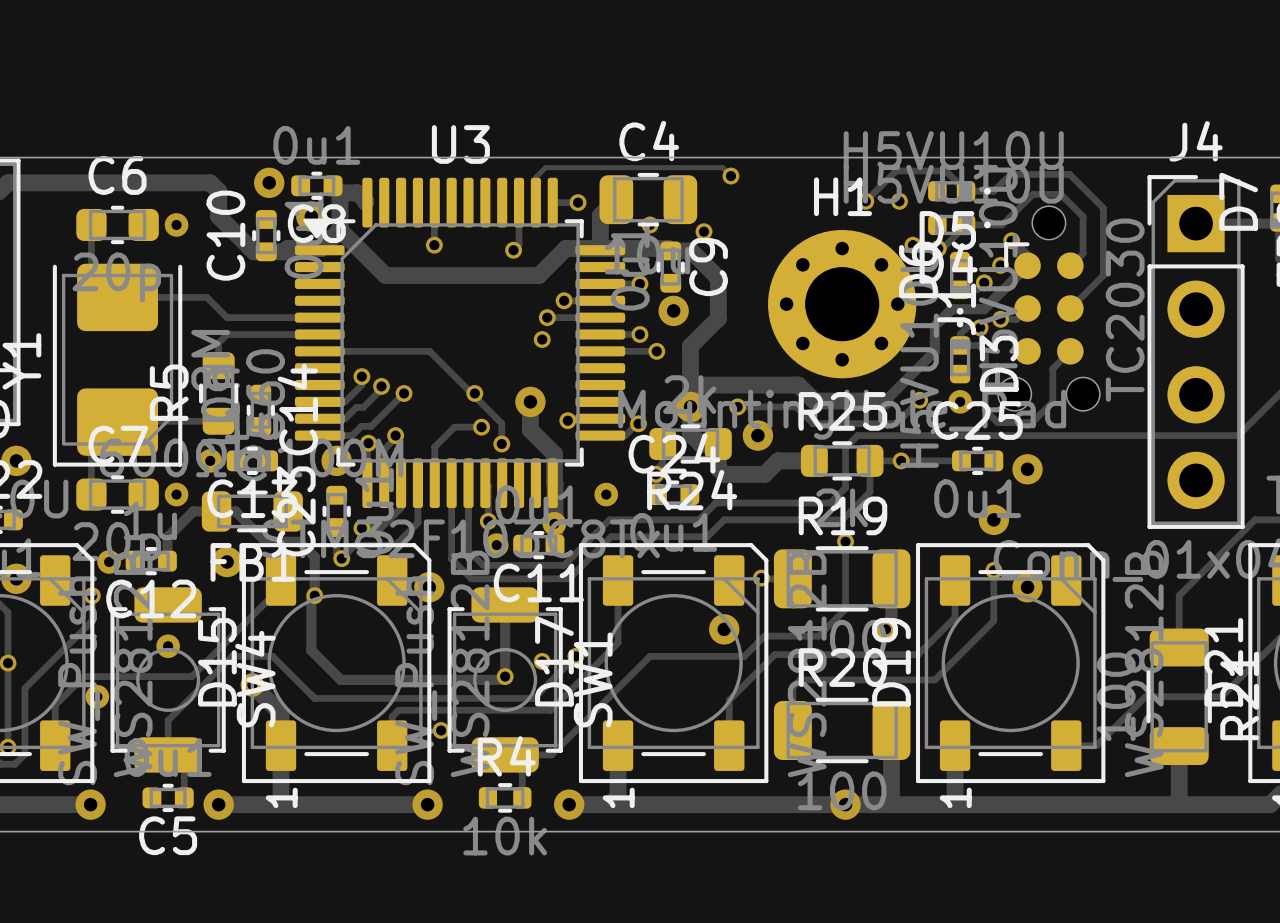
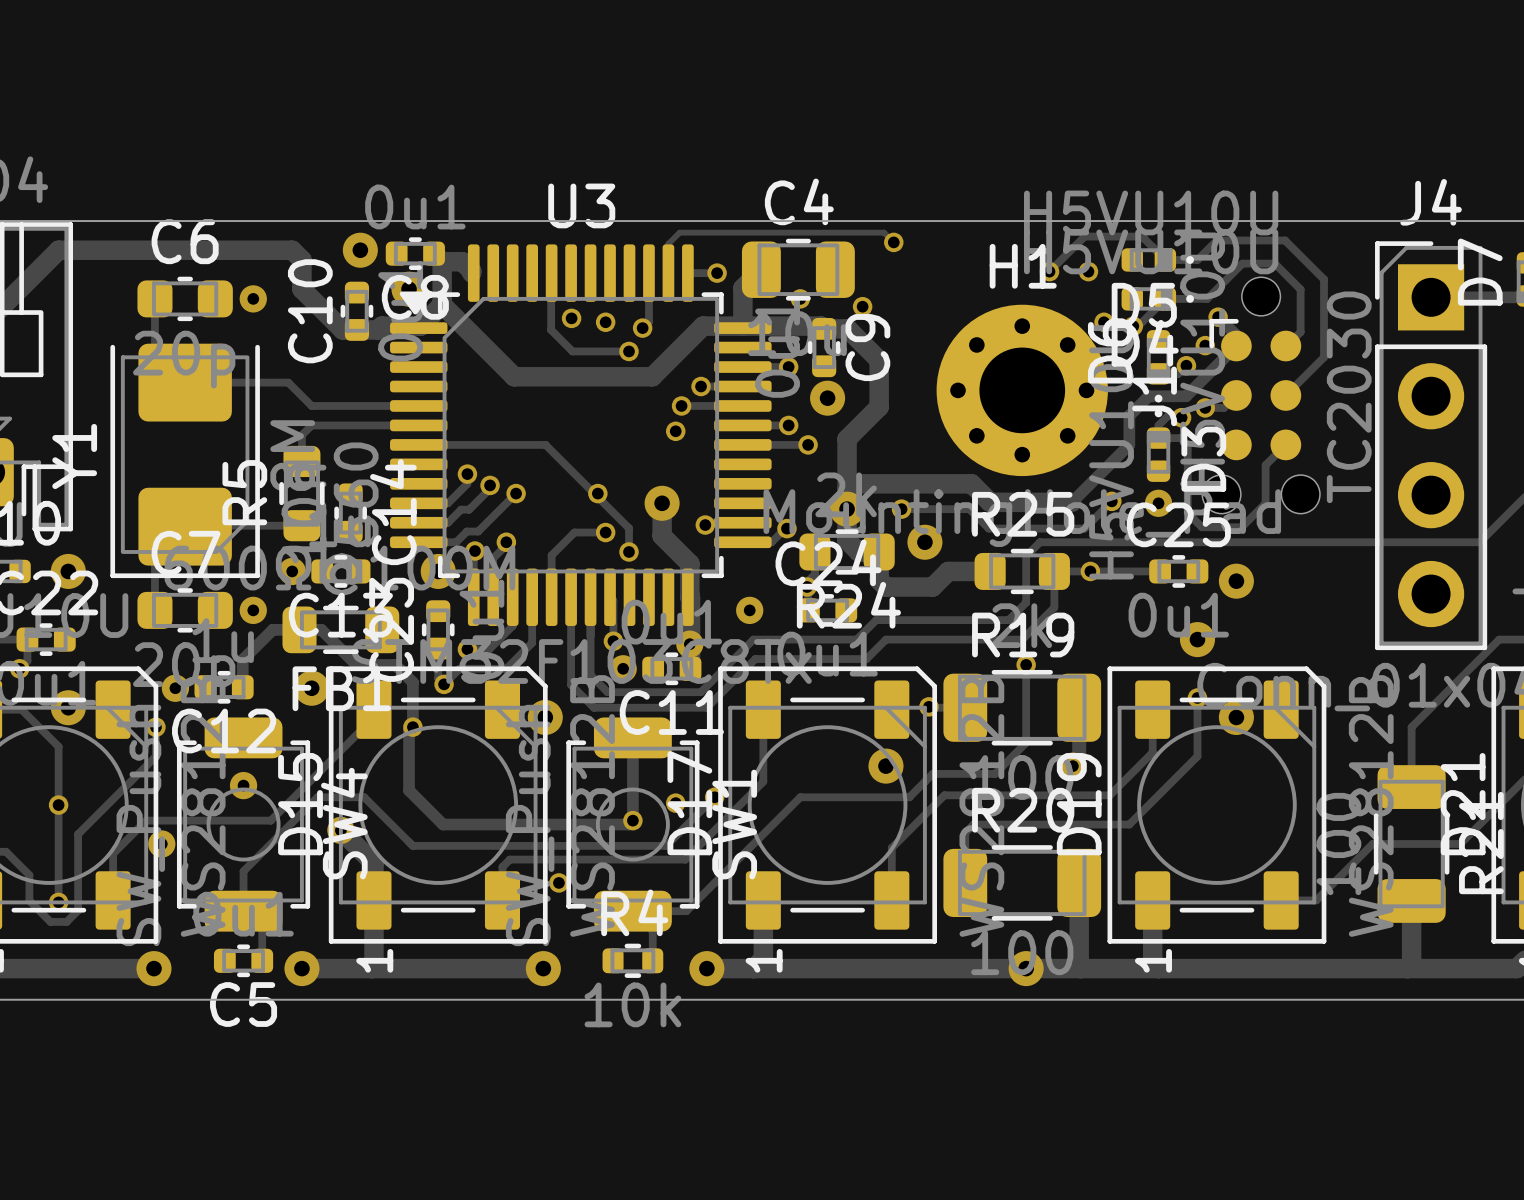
track: none -> (551, 322) (551, 330) (572, 351) (629, 351)
via position: (434, 245) -> (571, 318)
via: none -> (605, 322)
via: none -> (629, 351)
track: (385, 275) (538, 275) -> (494, 357) (514, 376) (652, 376) (671, 357)

